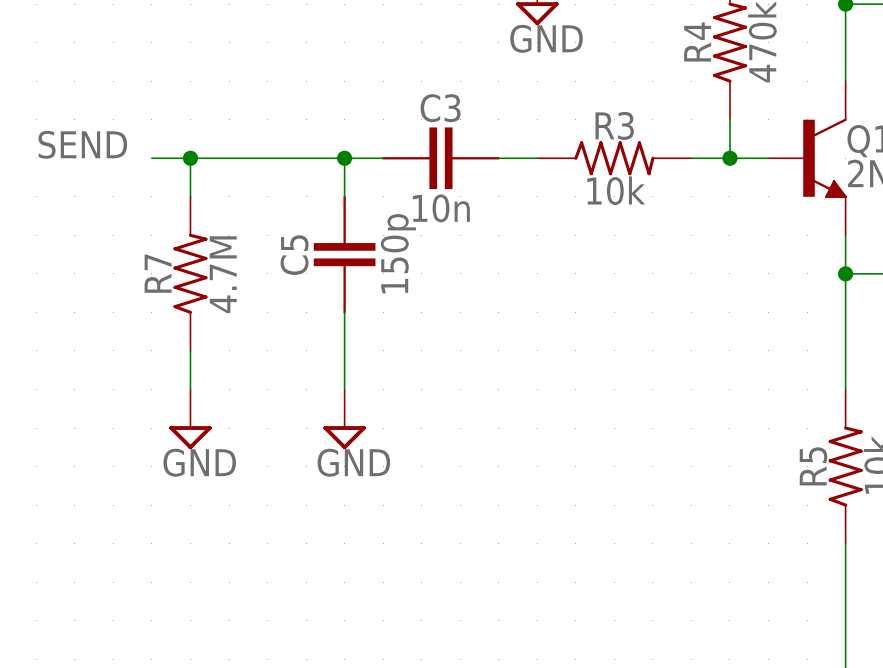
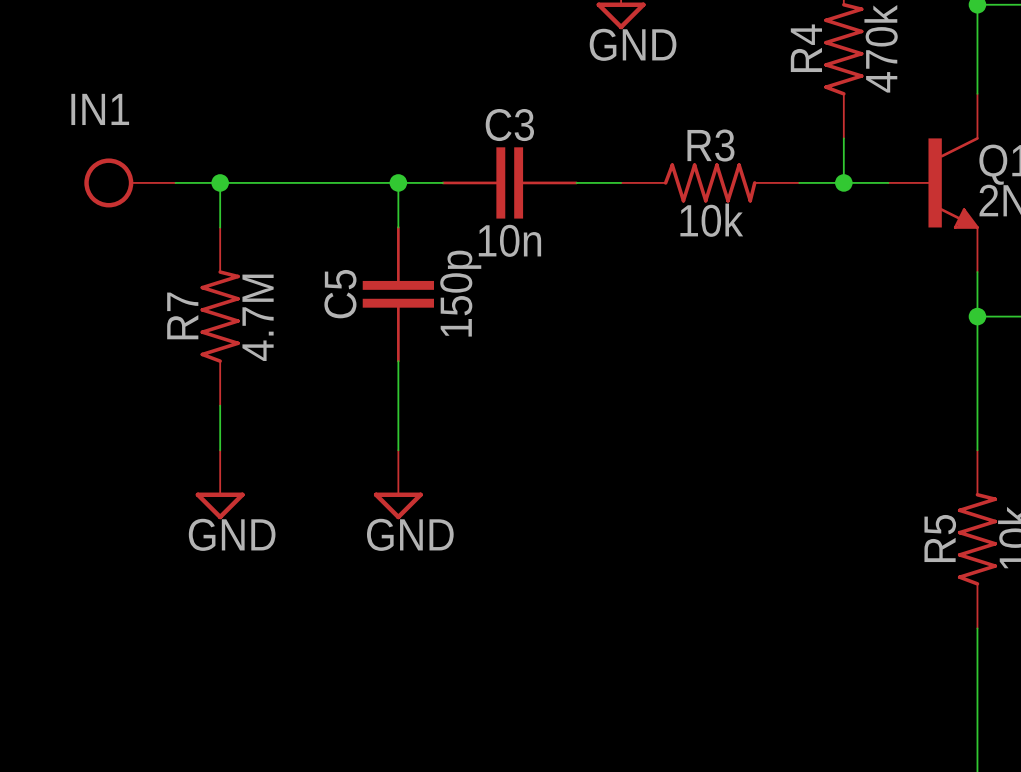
label: SEND (82, 144) -> none
IN1: none -> (129, 182)

